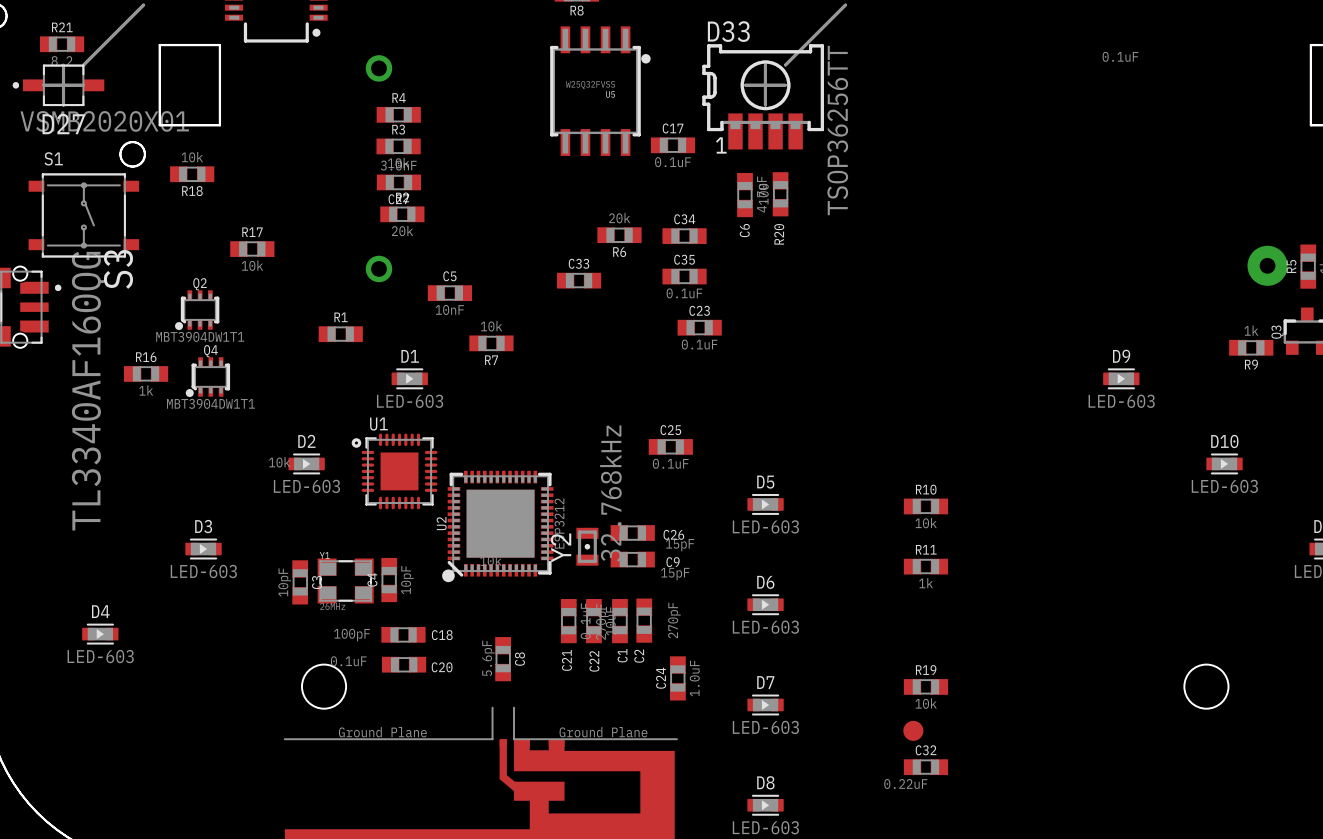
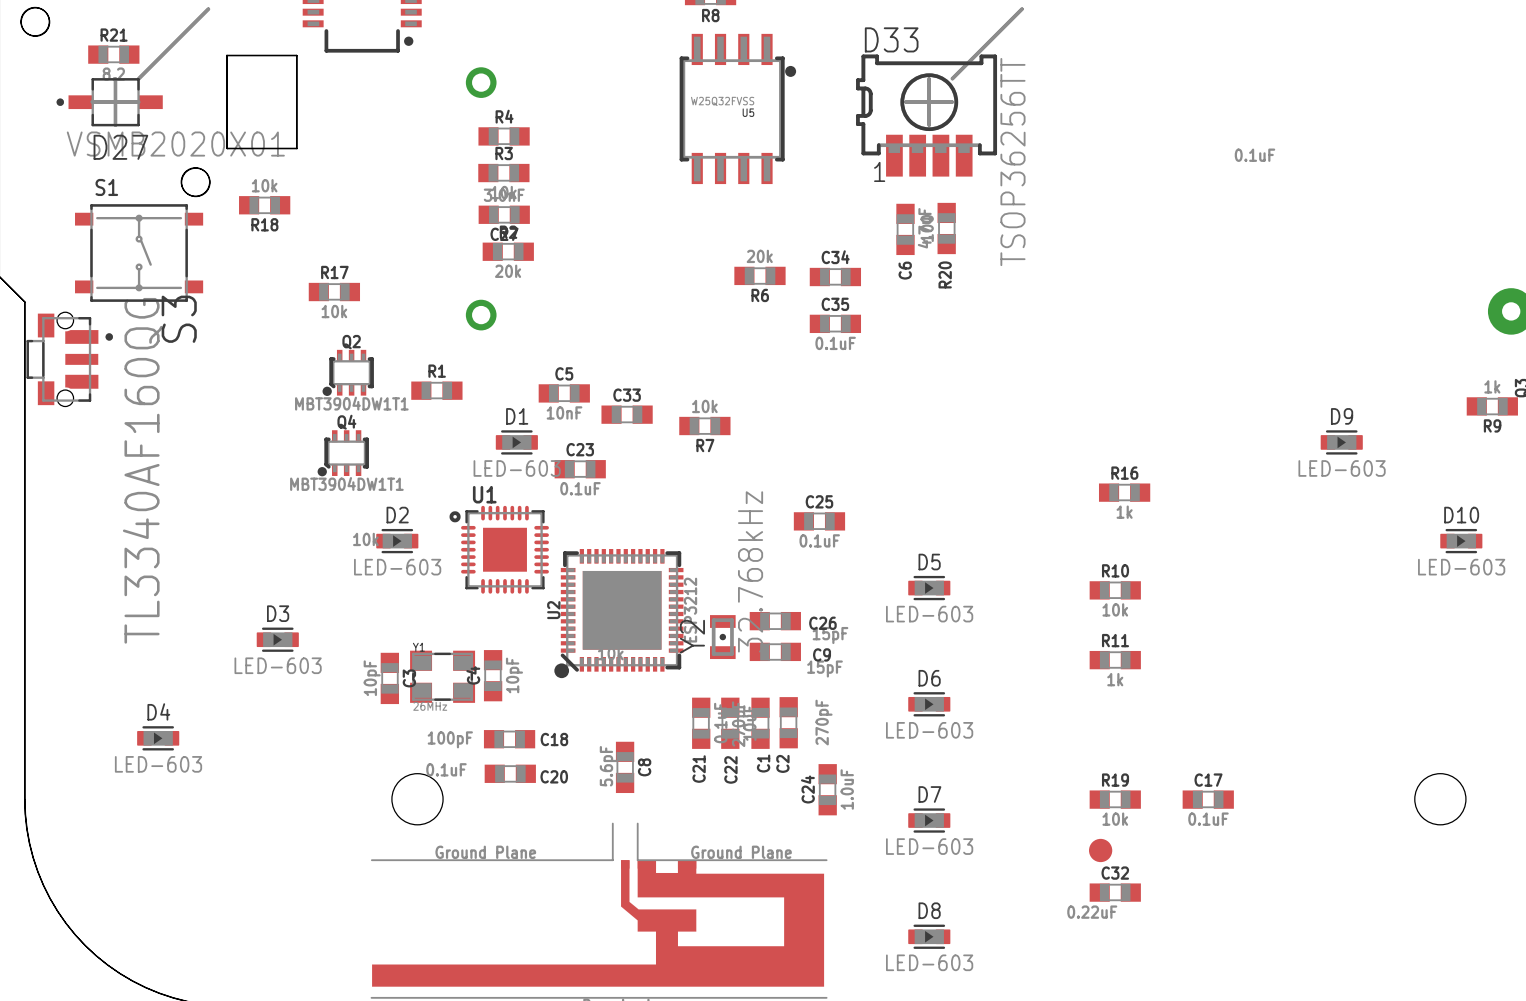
C17 position: (673, 145) -> (1208, 799)
C33 position: (579, 280) -> (627, 414)
C5 position: (449, 293) -> (564, 393)
Q2 position: (197, 310) -> (348, 372)
C23 position: (699, 327) -> (580, 469)
R7 position: (491, 343) -> (704, 426)
R16 position: (146, 373) -> (1124, 492)
Q4 position: (207, 377) -> (343, 453)

